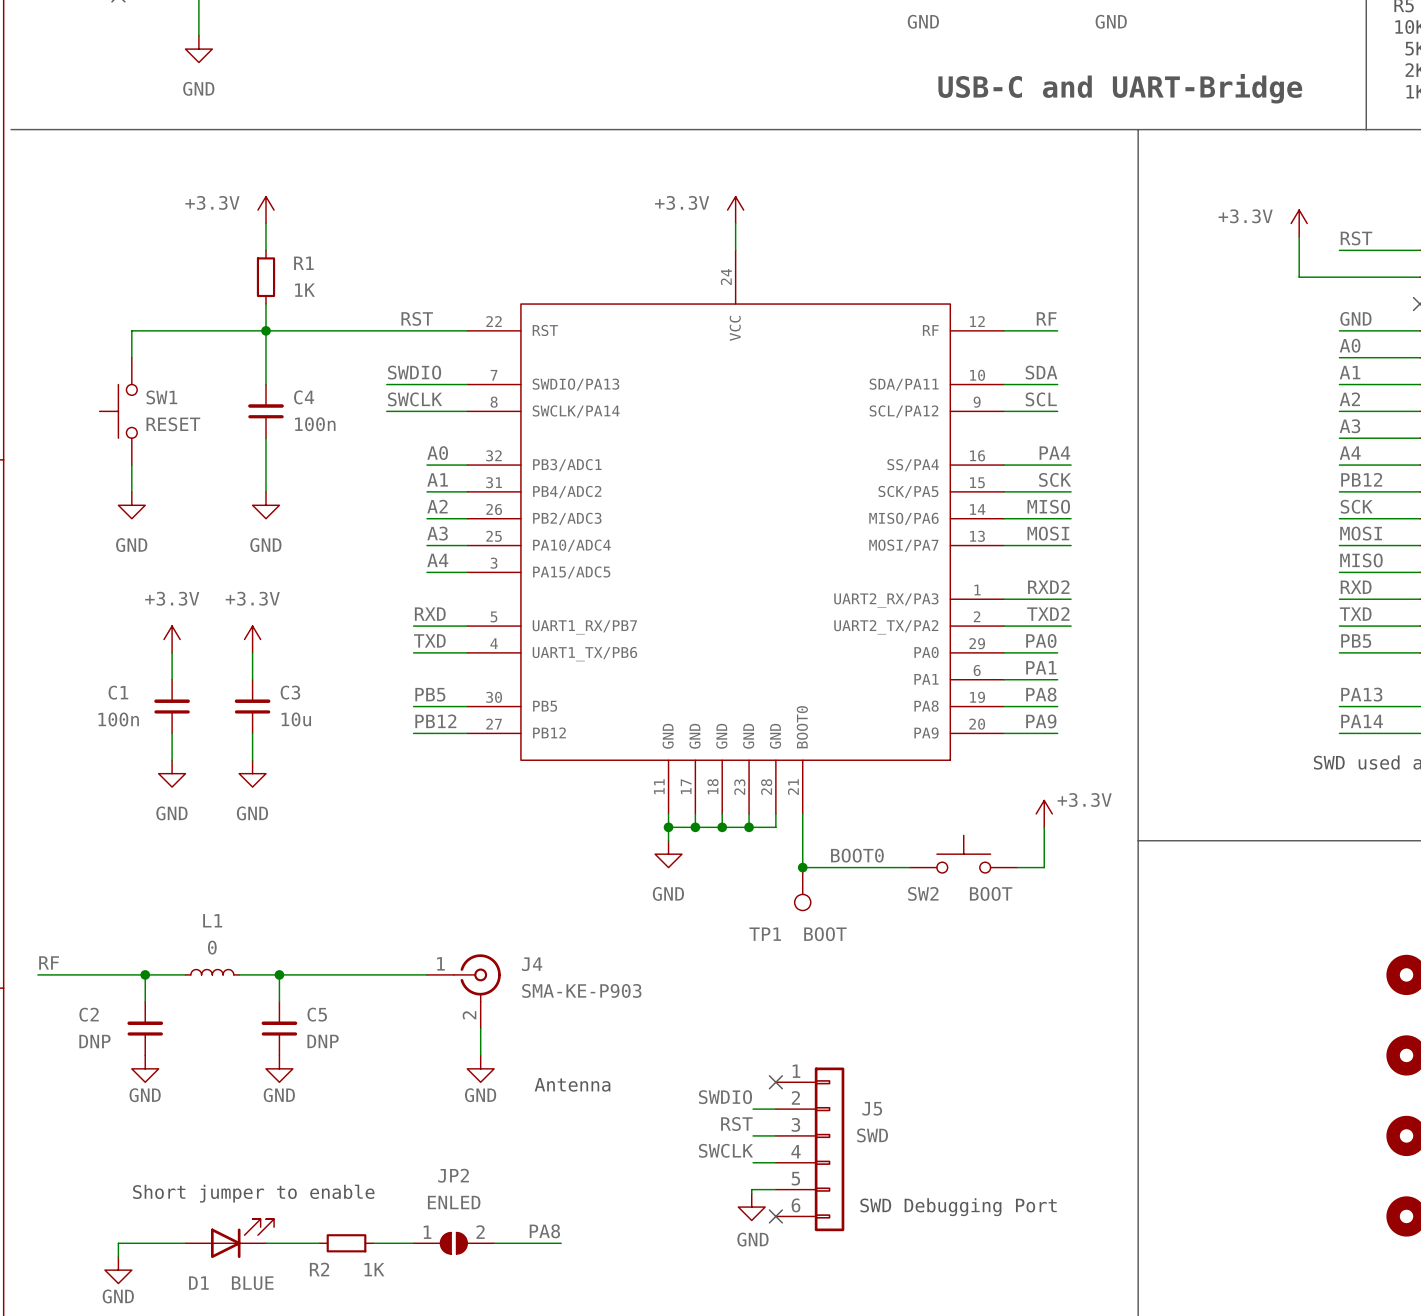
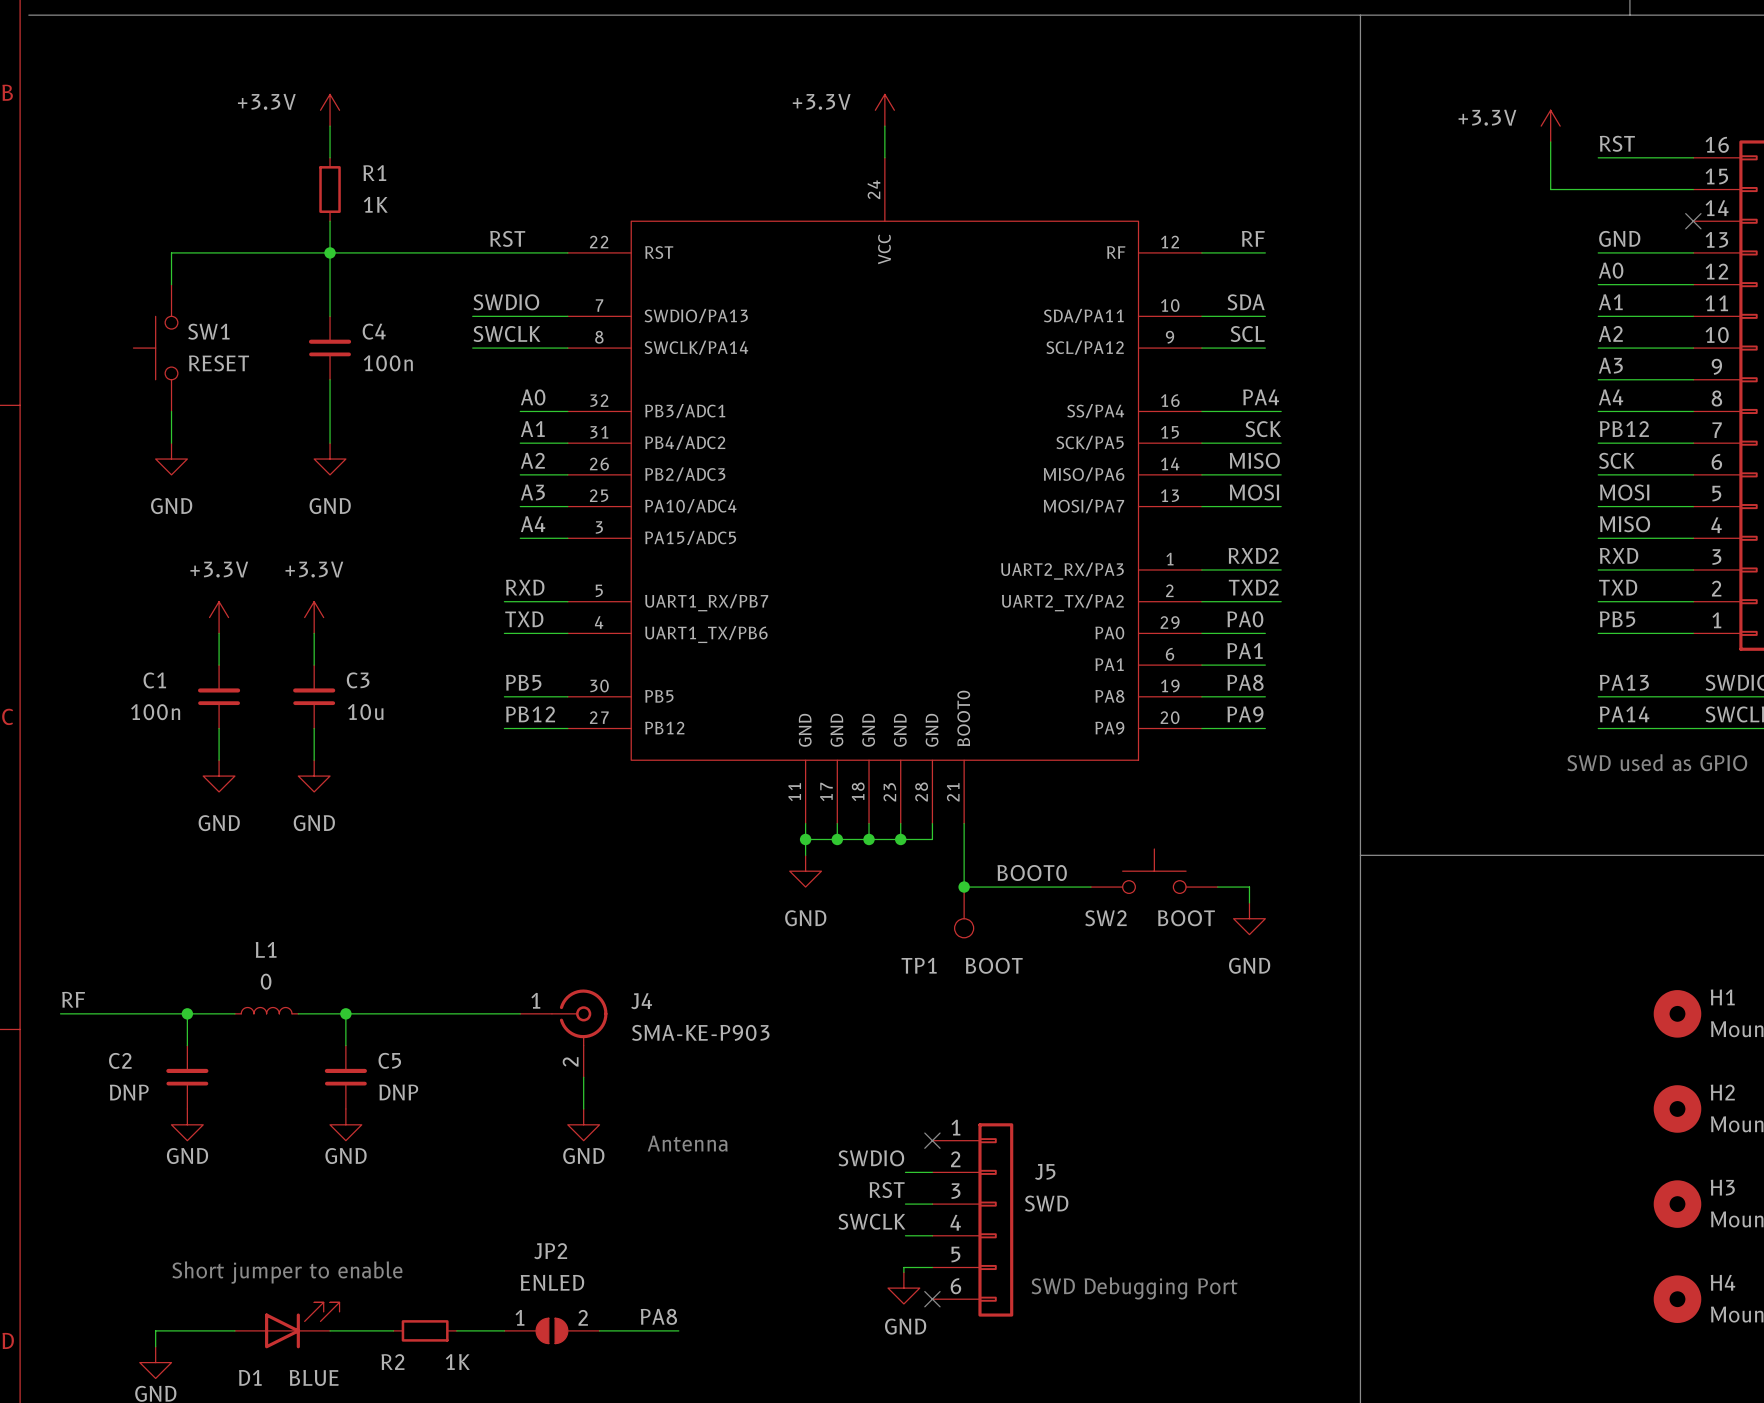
power symbol: +3.3V (1044, 813) -> none
wire: (1044, 827) (1044, 867) -> (1249, 902) (1249, 887)
power symbol: none -> GND (1249, 918)

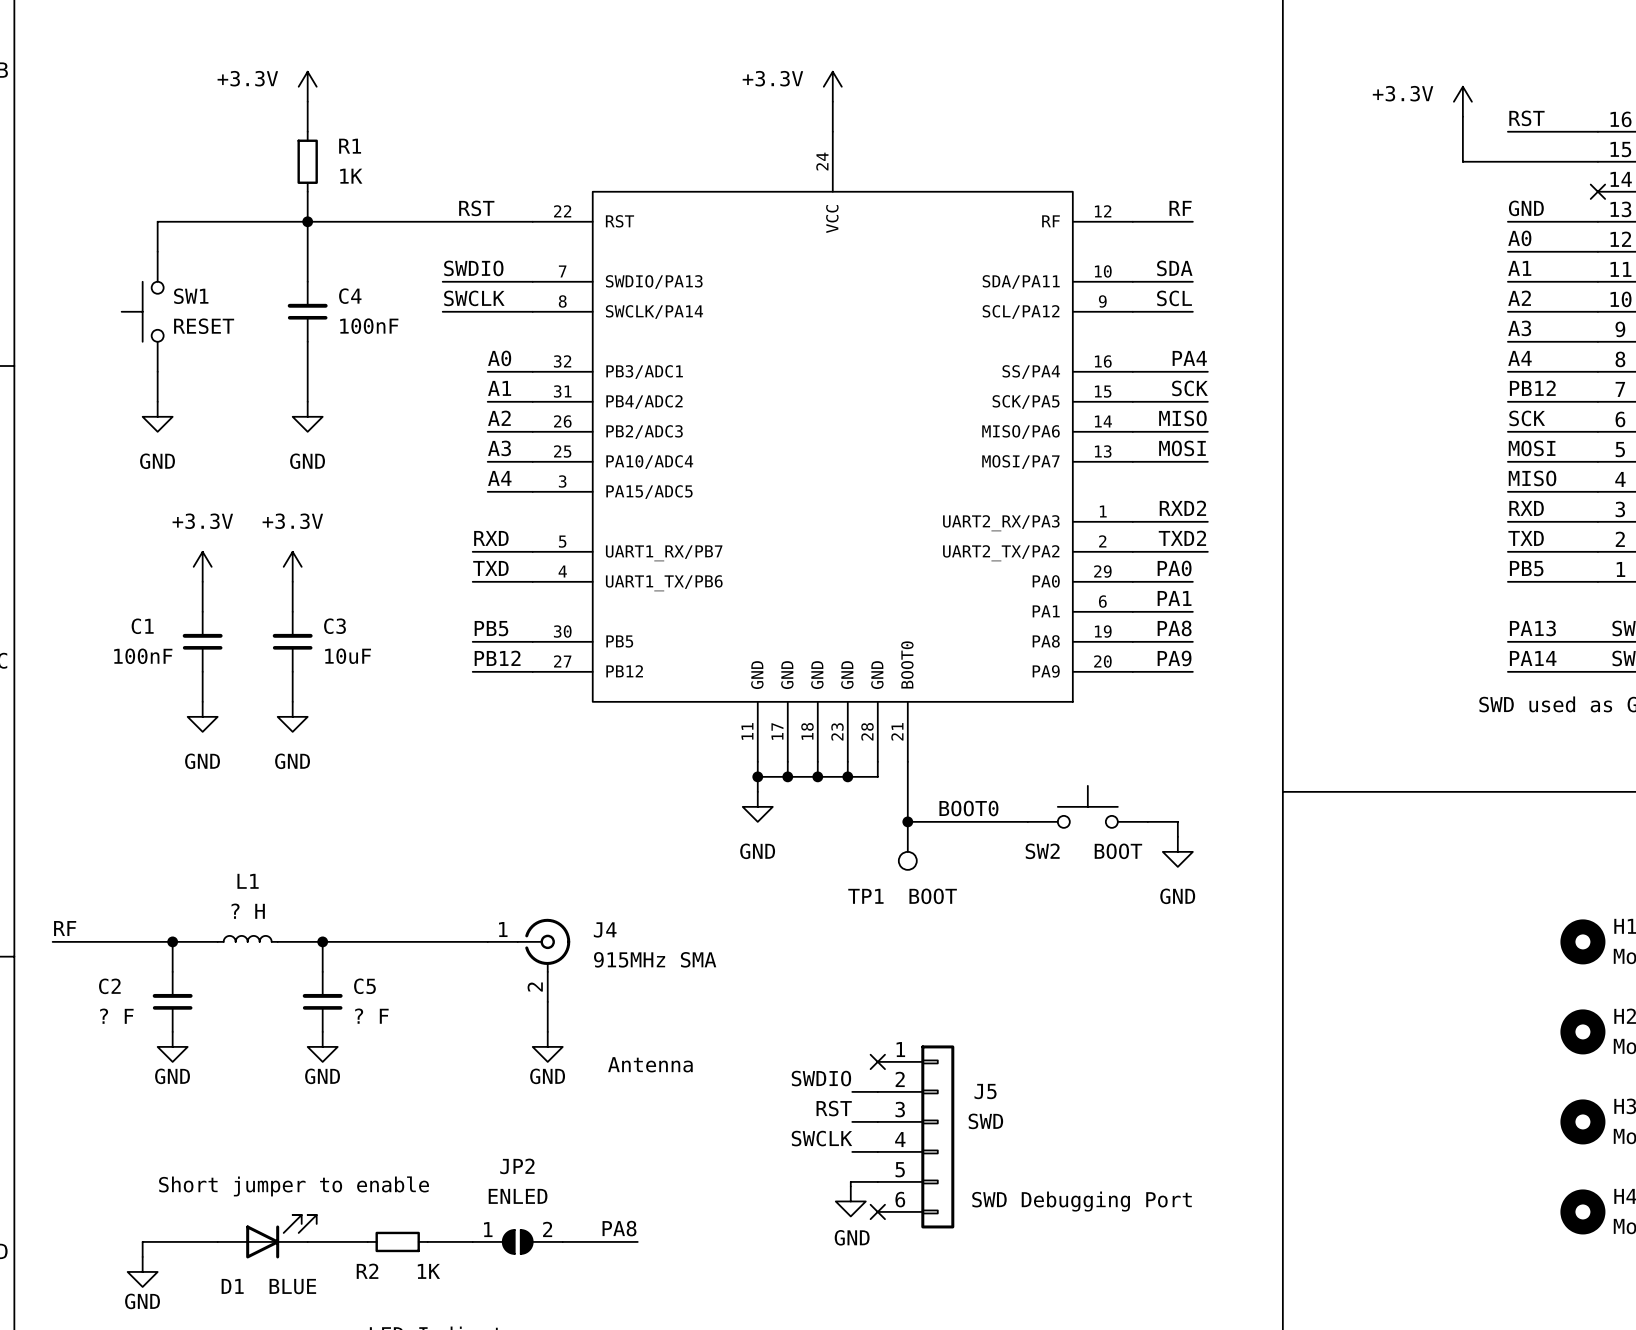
C4 value: 100n (388, 363) -> 100nF (369, 326)
C1 value: 100n (155, 712) -> 100nF (143, 656)
C3 value: 10u (365, 712) -> 10uF (348, 656)
L1 value: 0 (266, 981) -> ? H (248, 911)
J4 value: SMA-KE-P903 (700, 1032) -> 915MHz SMA (655, 959)
C2 value: DNP (129, 1092) -> ? F (116, 1016)
C5 value: DNP (398, 1092) -> ? F (371, 1016)

